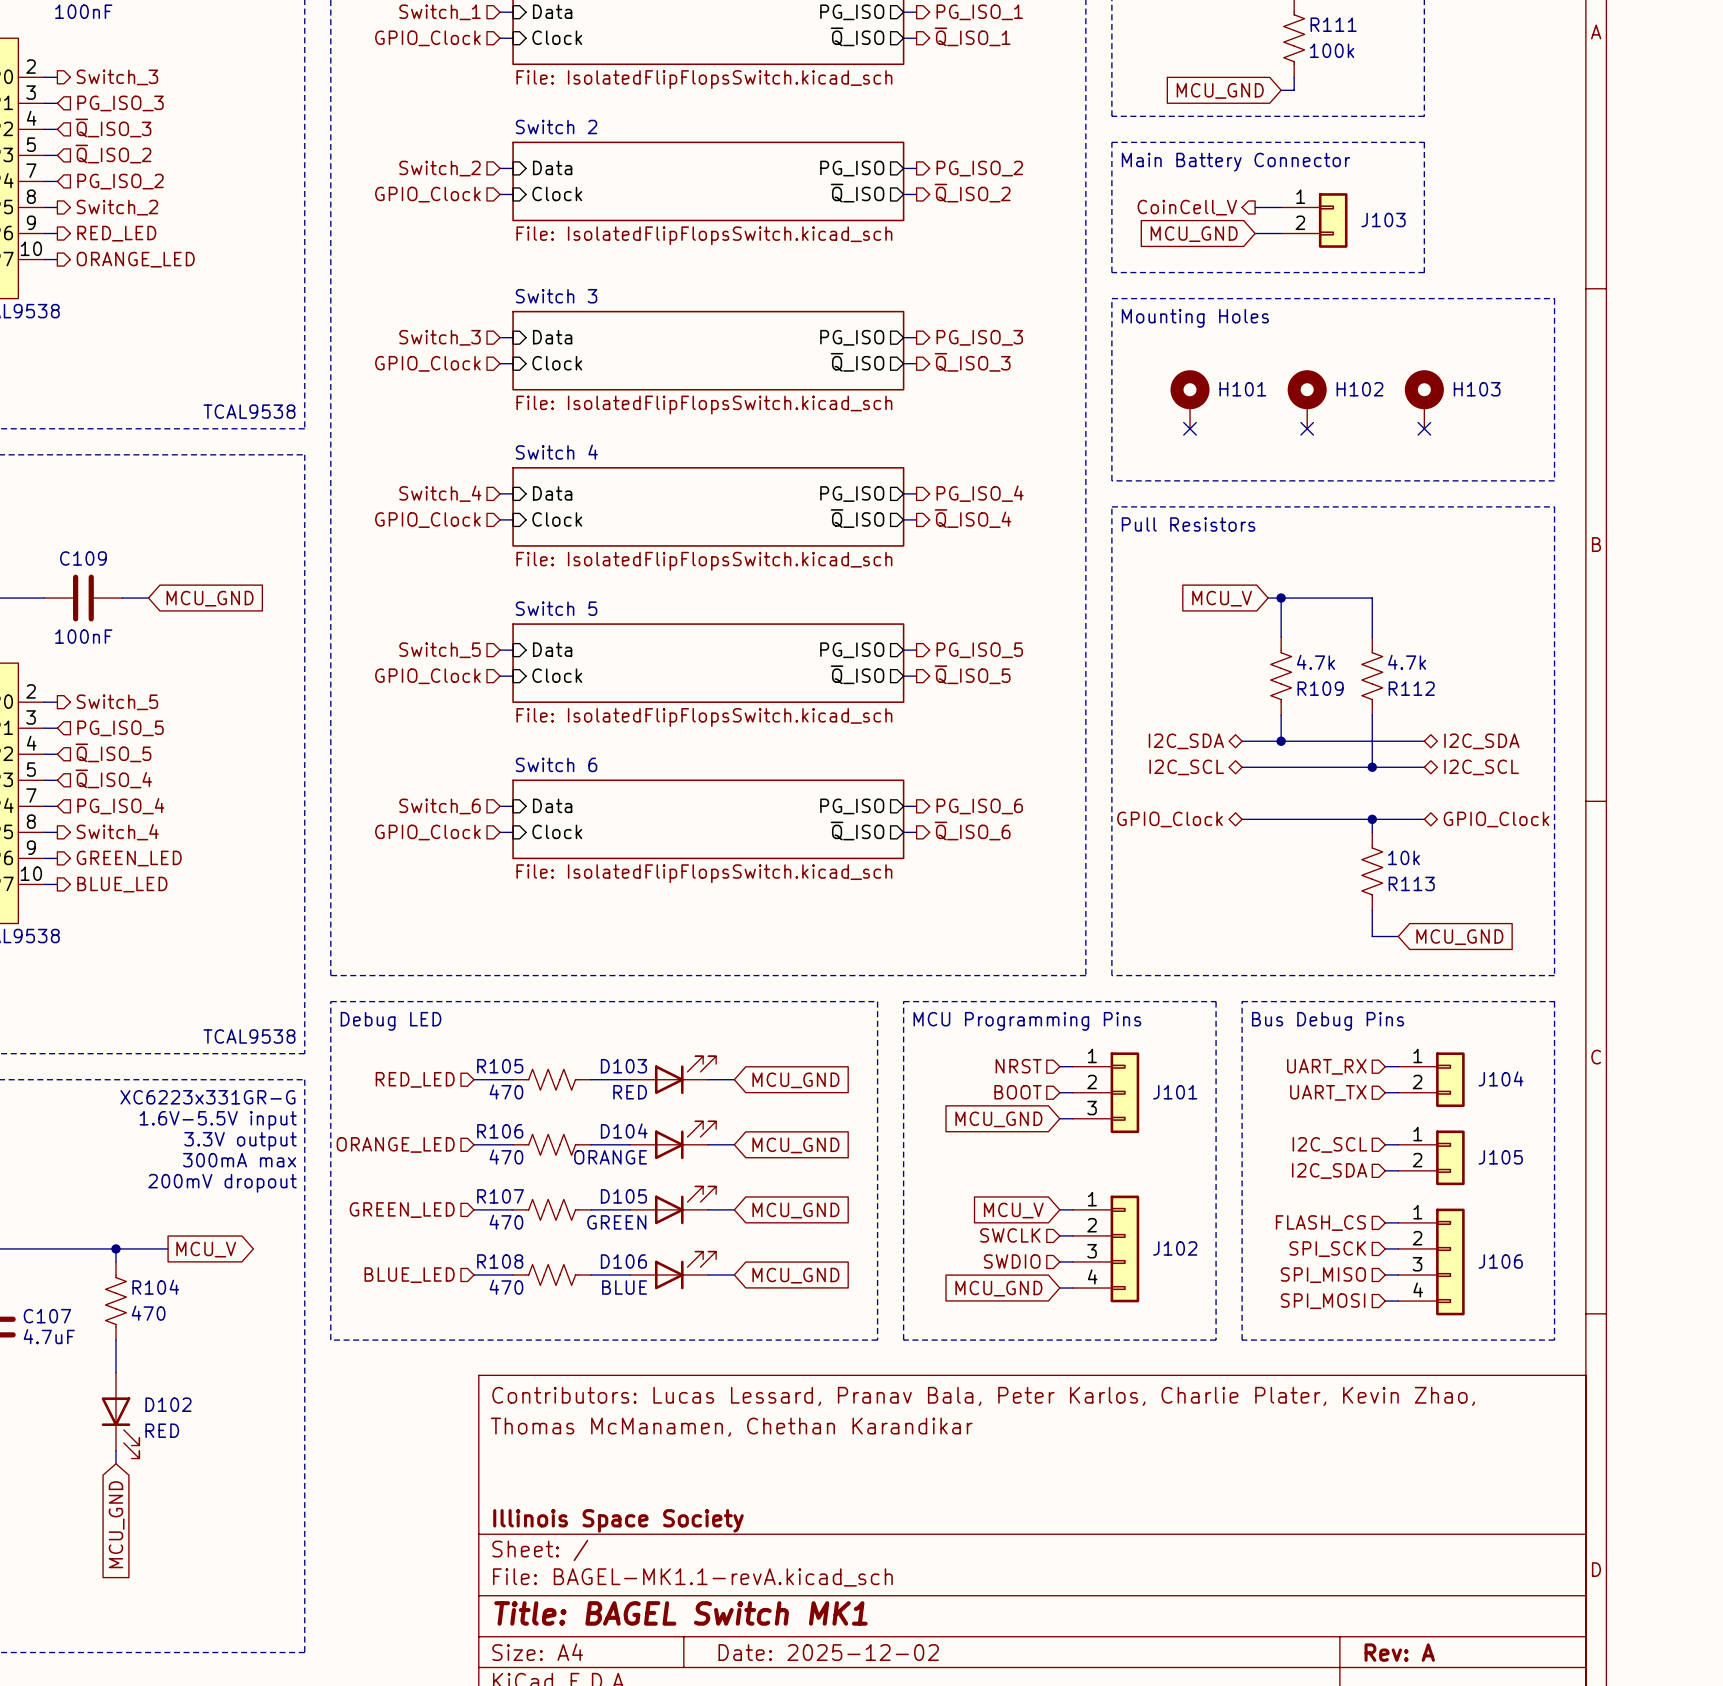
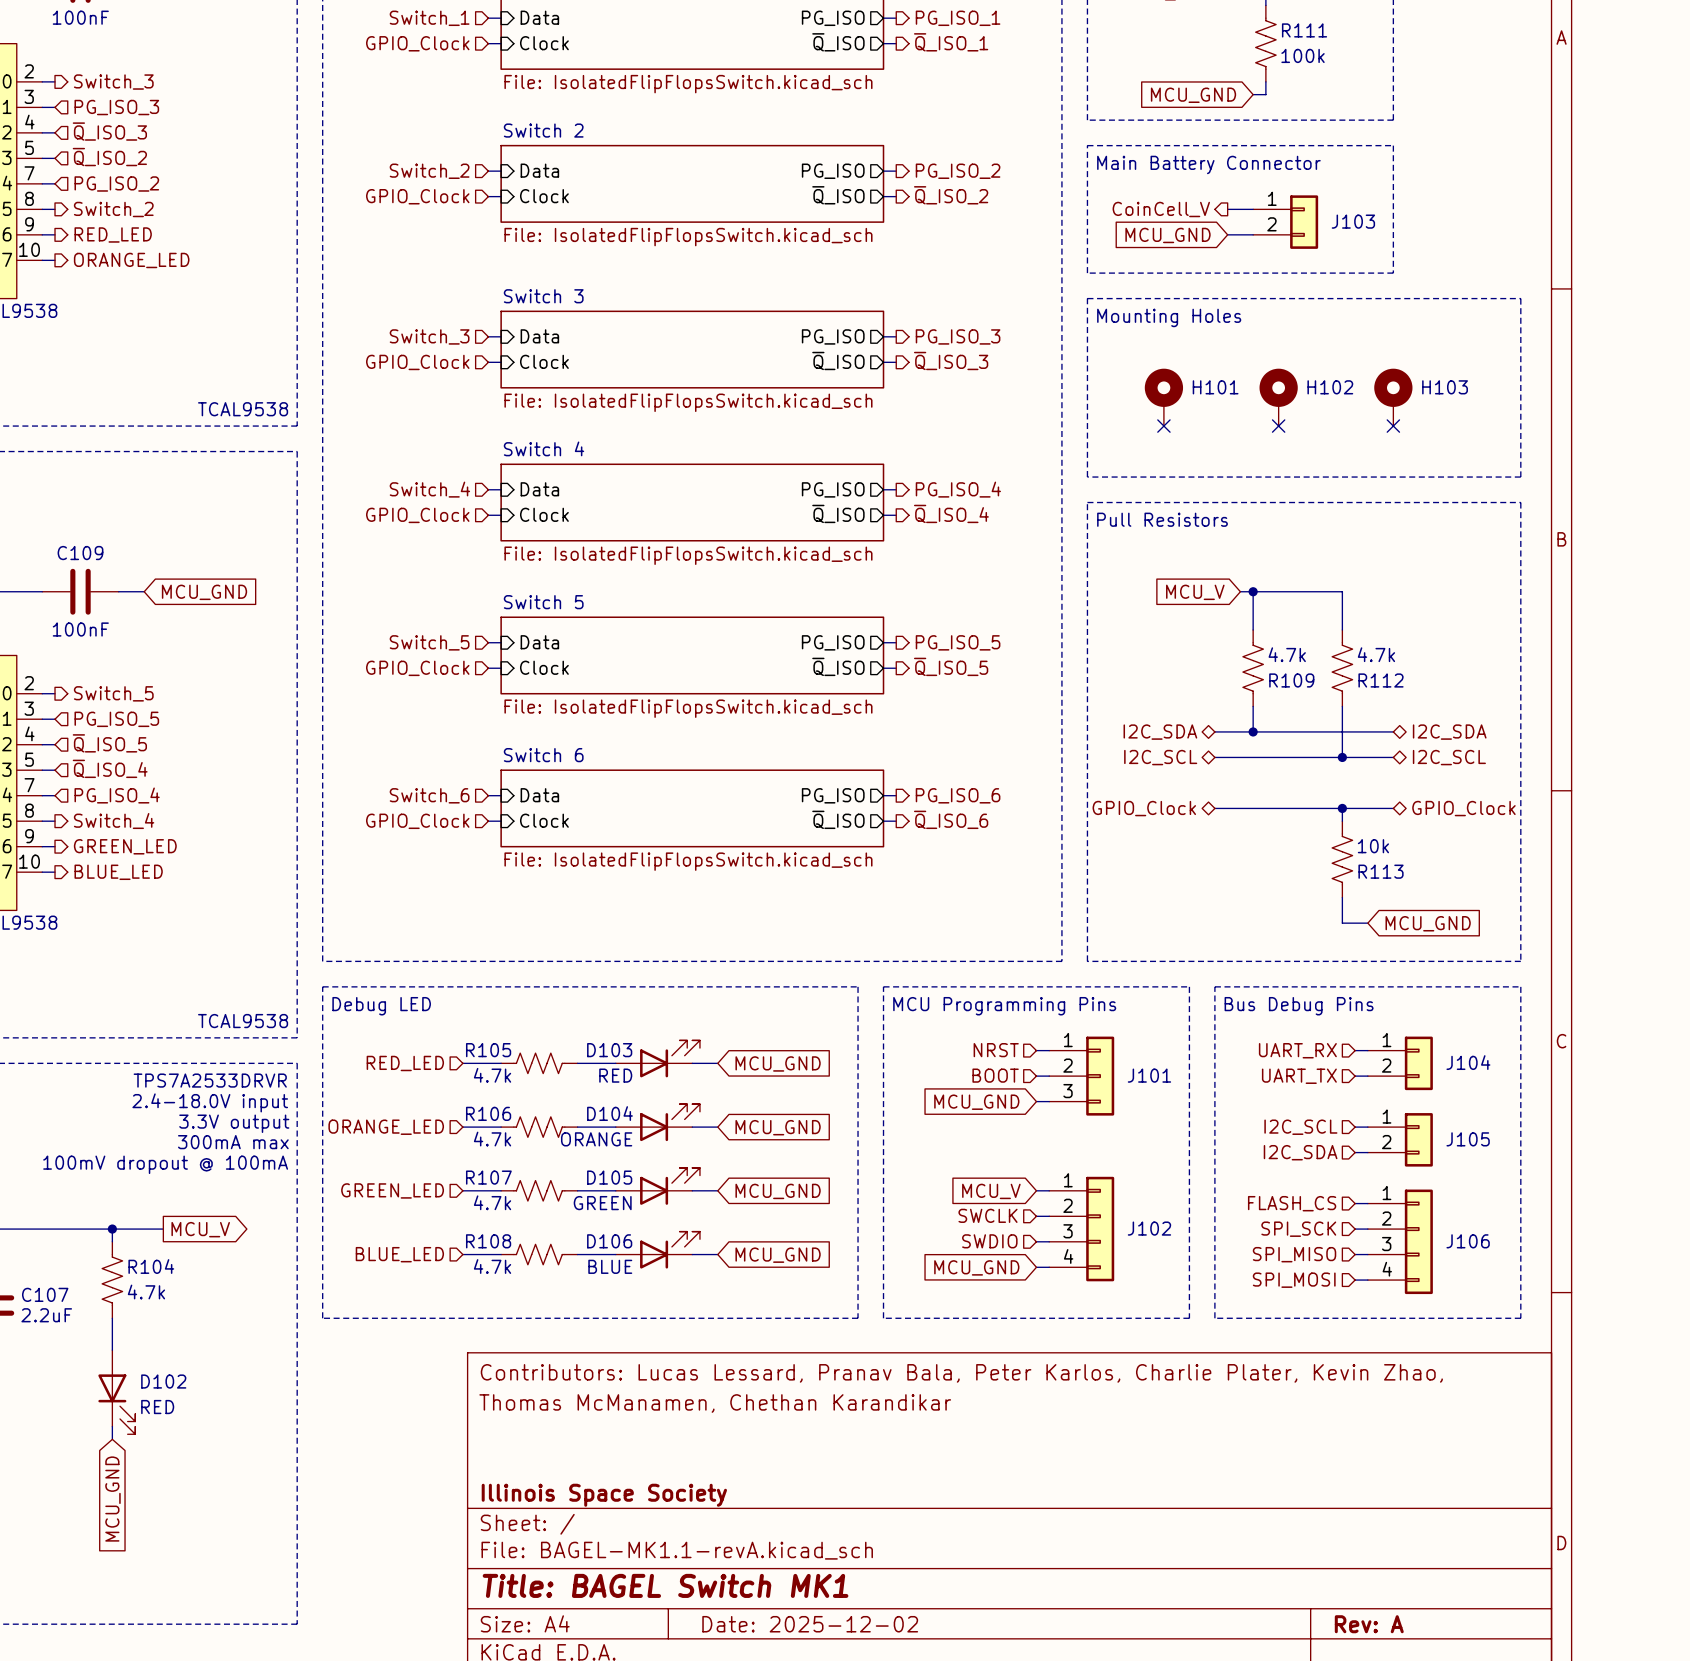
R105 value: 470 (506, 1091) -> 4.7k (492, 1075)
text: XC6223x331GR-G (207, 1097) -> TPS7A2533DRVR (210, 1080)
text: 1.6V-5.5V input (218, 1120) -> 2.4-18.0V input (210, 1102)
R106 value: 470 (506, 1157) -> 4.7k (492, 1139)
text: 200mV dropout (222, 1183) -> 100mV dropout @ 100mA (165, 1164)
R107 value: 470 (506, 1222) -> 4.7k (492, 1202)
R108 value: 470 (506, 1287) -> 4.7k (492, 1266)
R104 value: 470 (148, 1313) -> 4.7k (146, 1292)
C107 value: 4.7uF (49, 1336) -> 2.2uF (46, 1315)

